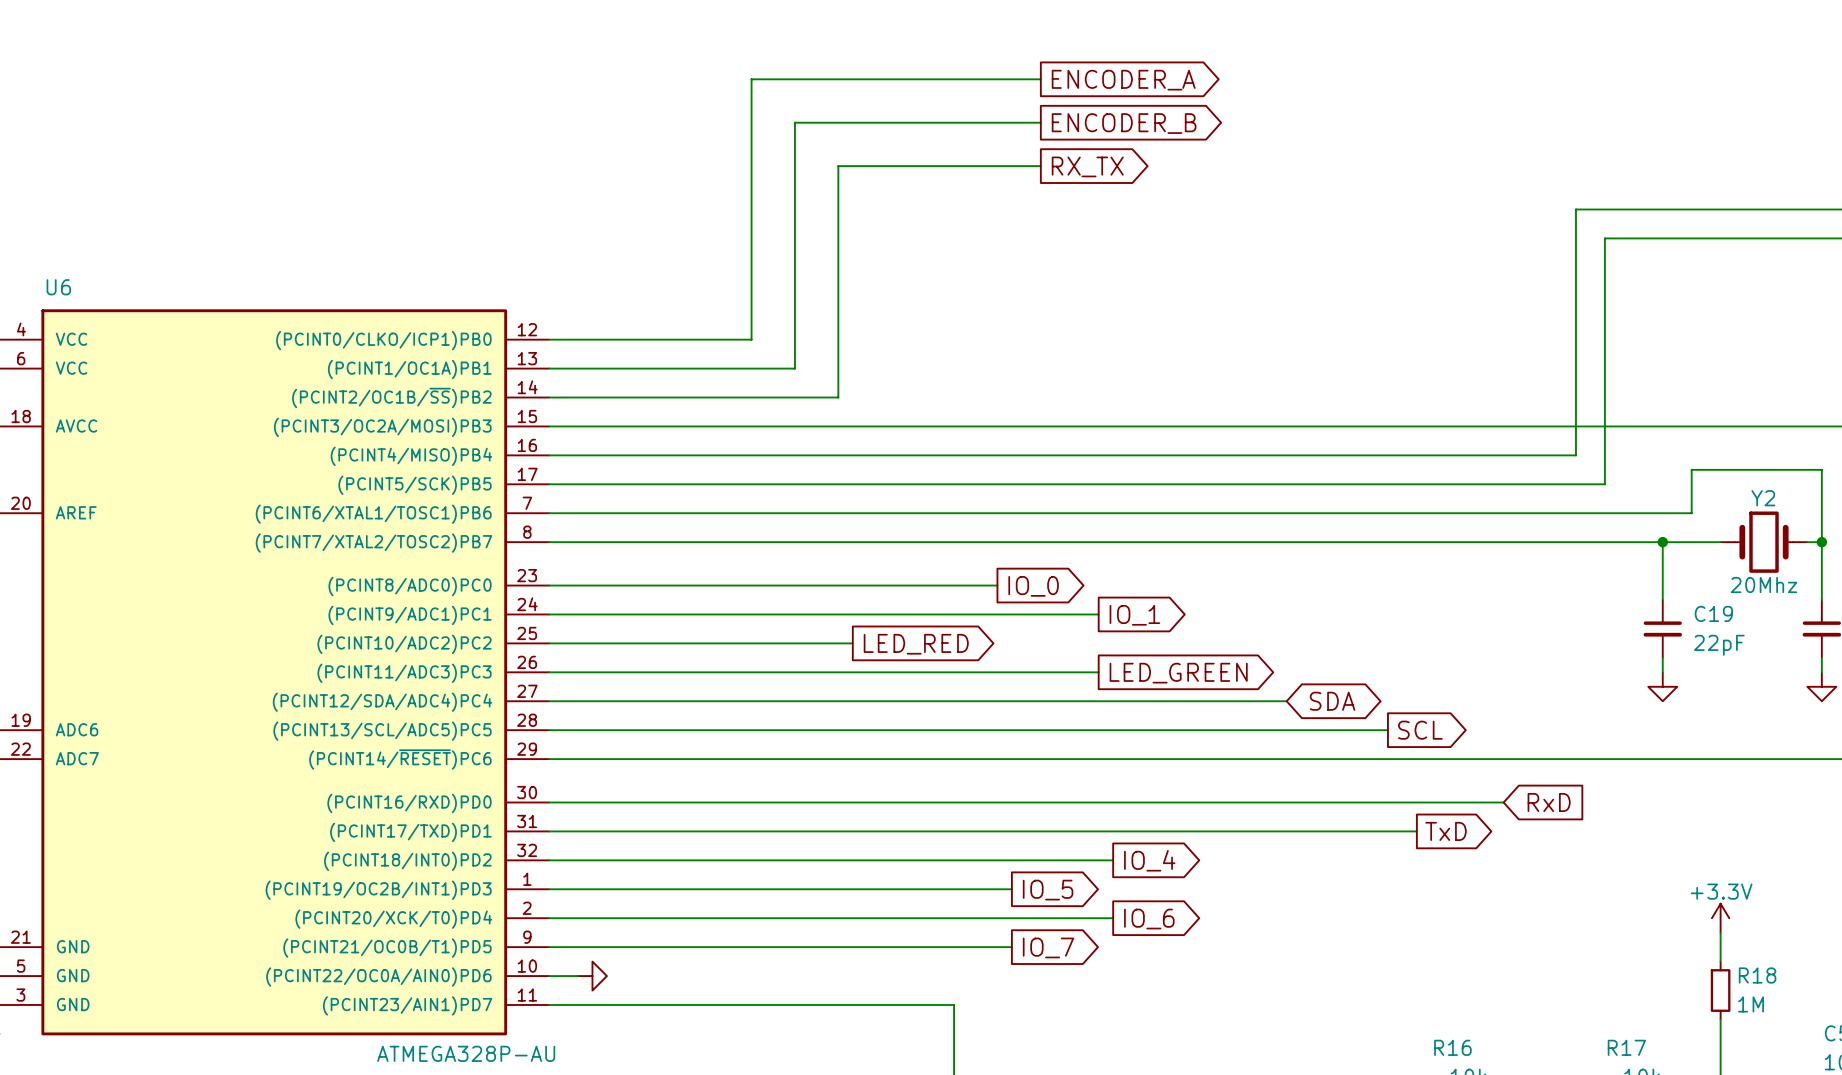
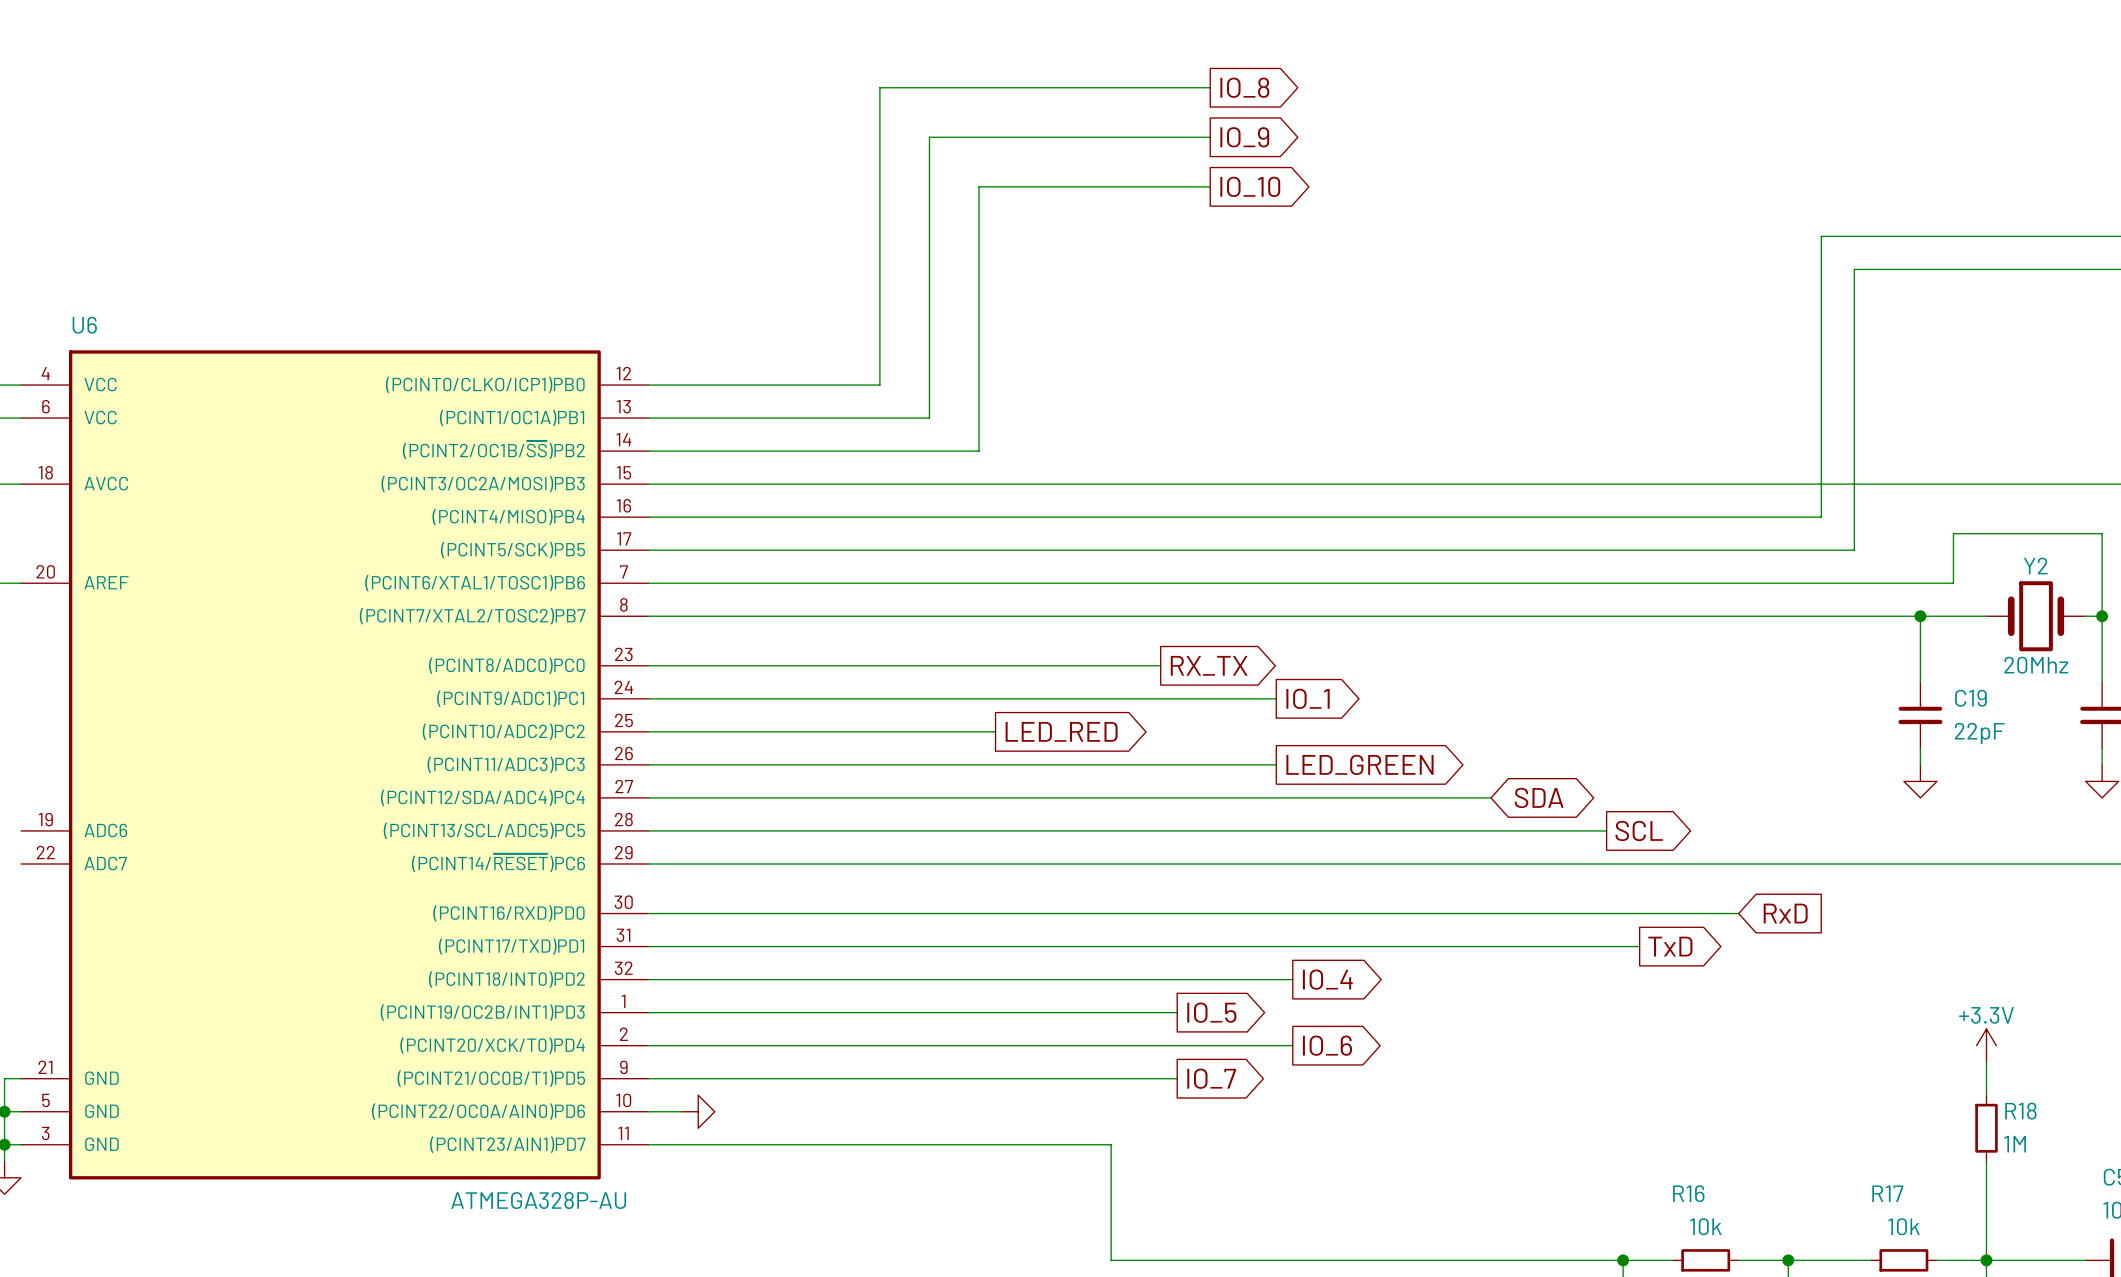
global label: ENCODER_A (1123, 80) -> IO_8 (1244, 87)
global label: ENCODER_B (1124, 123) -> IO_9 (1244, 137)
global label: RX_TX (1087, 166) -> IO_10 (1250, 186)
global label: IO_0 (1033, 586) -> RX_TX (1209, 665)

